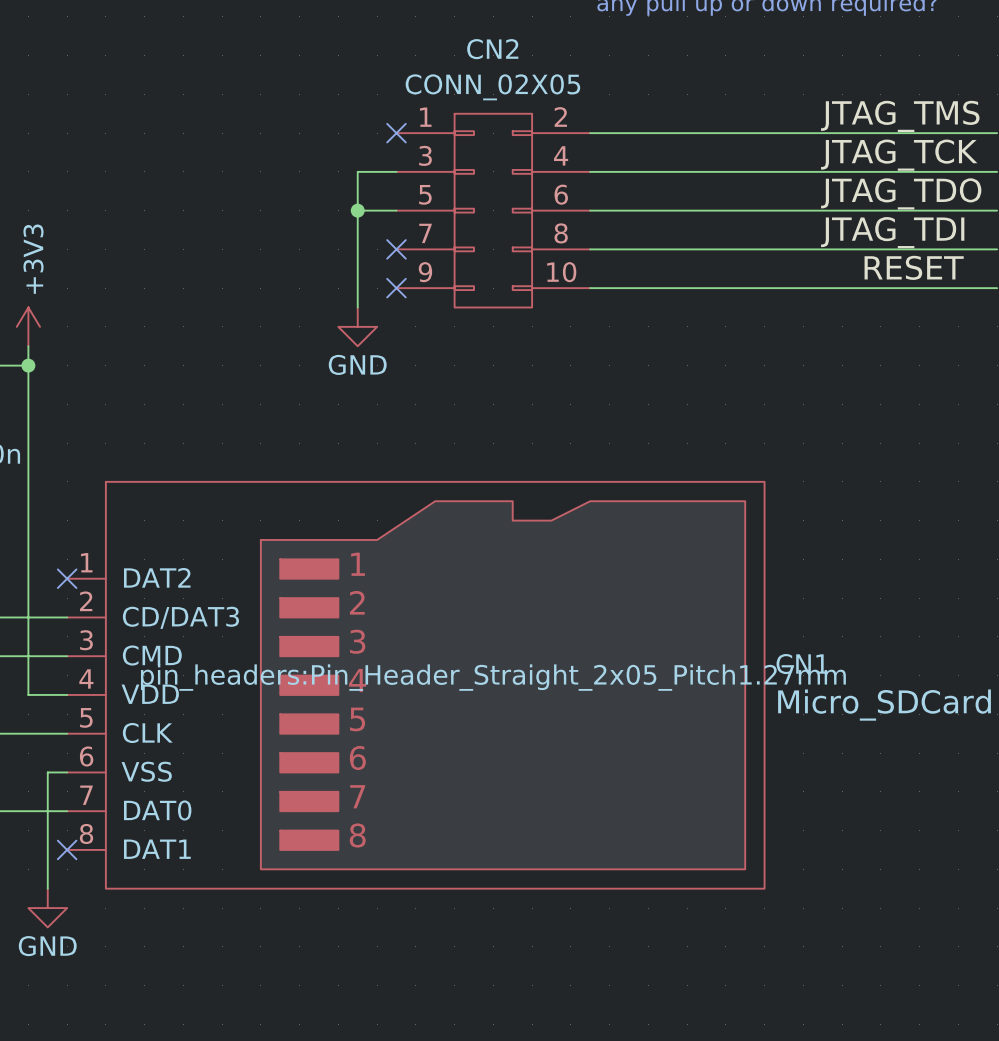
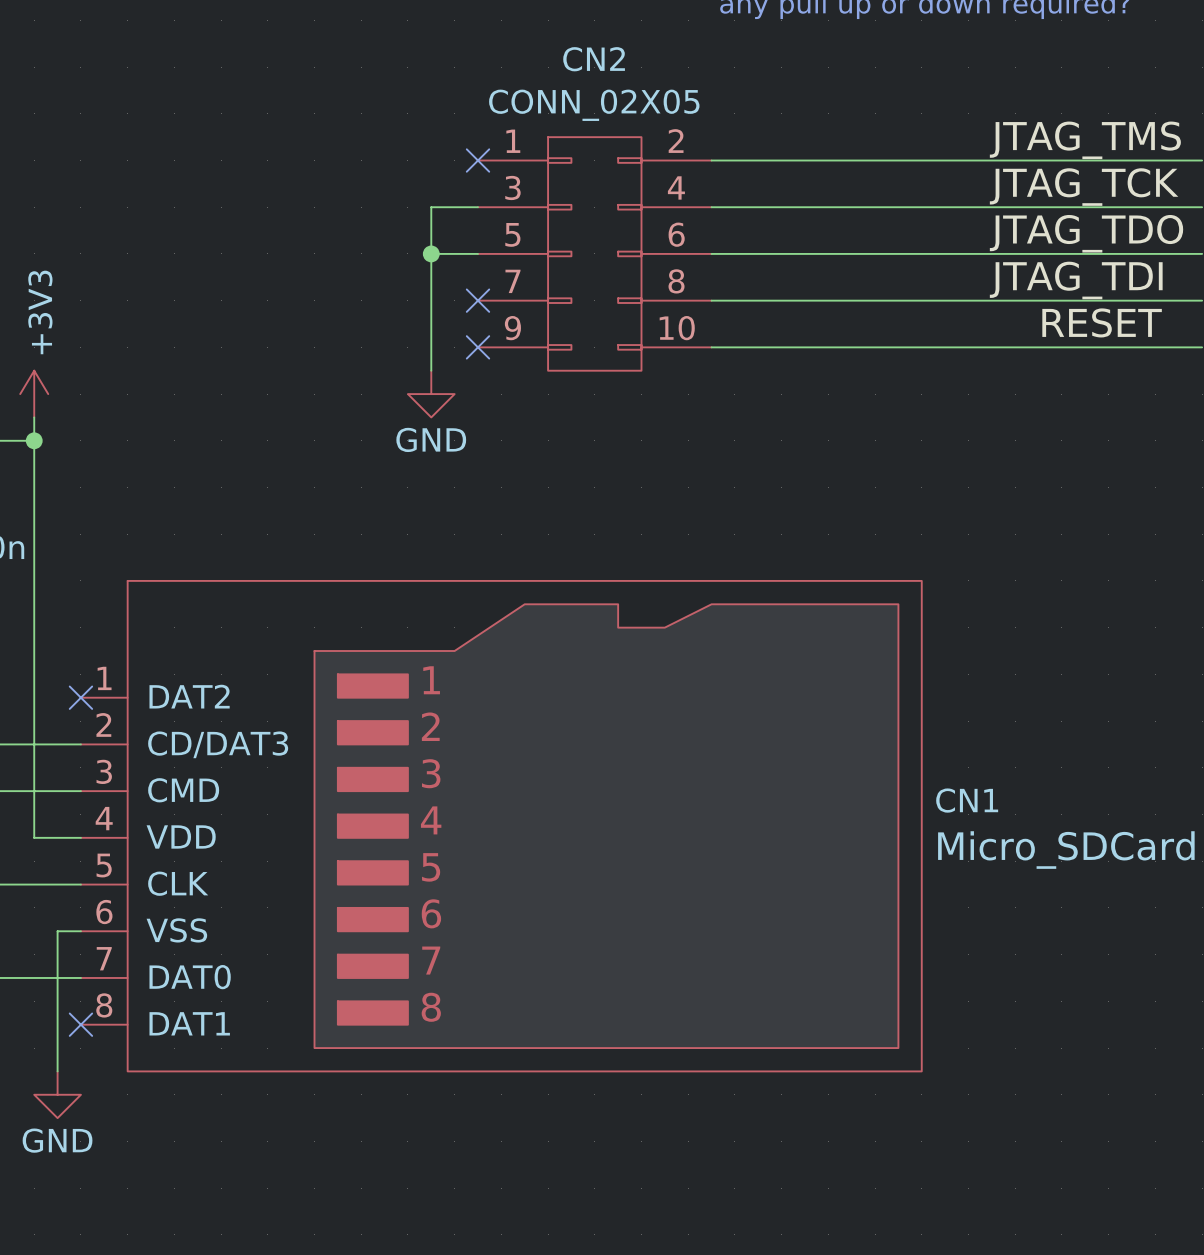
CN2 text: pin_headers:Pin_Header_Straight_2x05_Pitch1.27mm (493, 677) -> none

